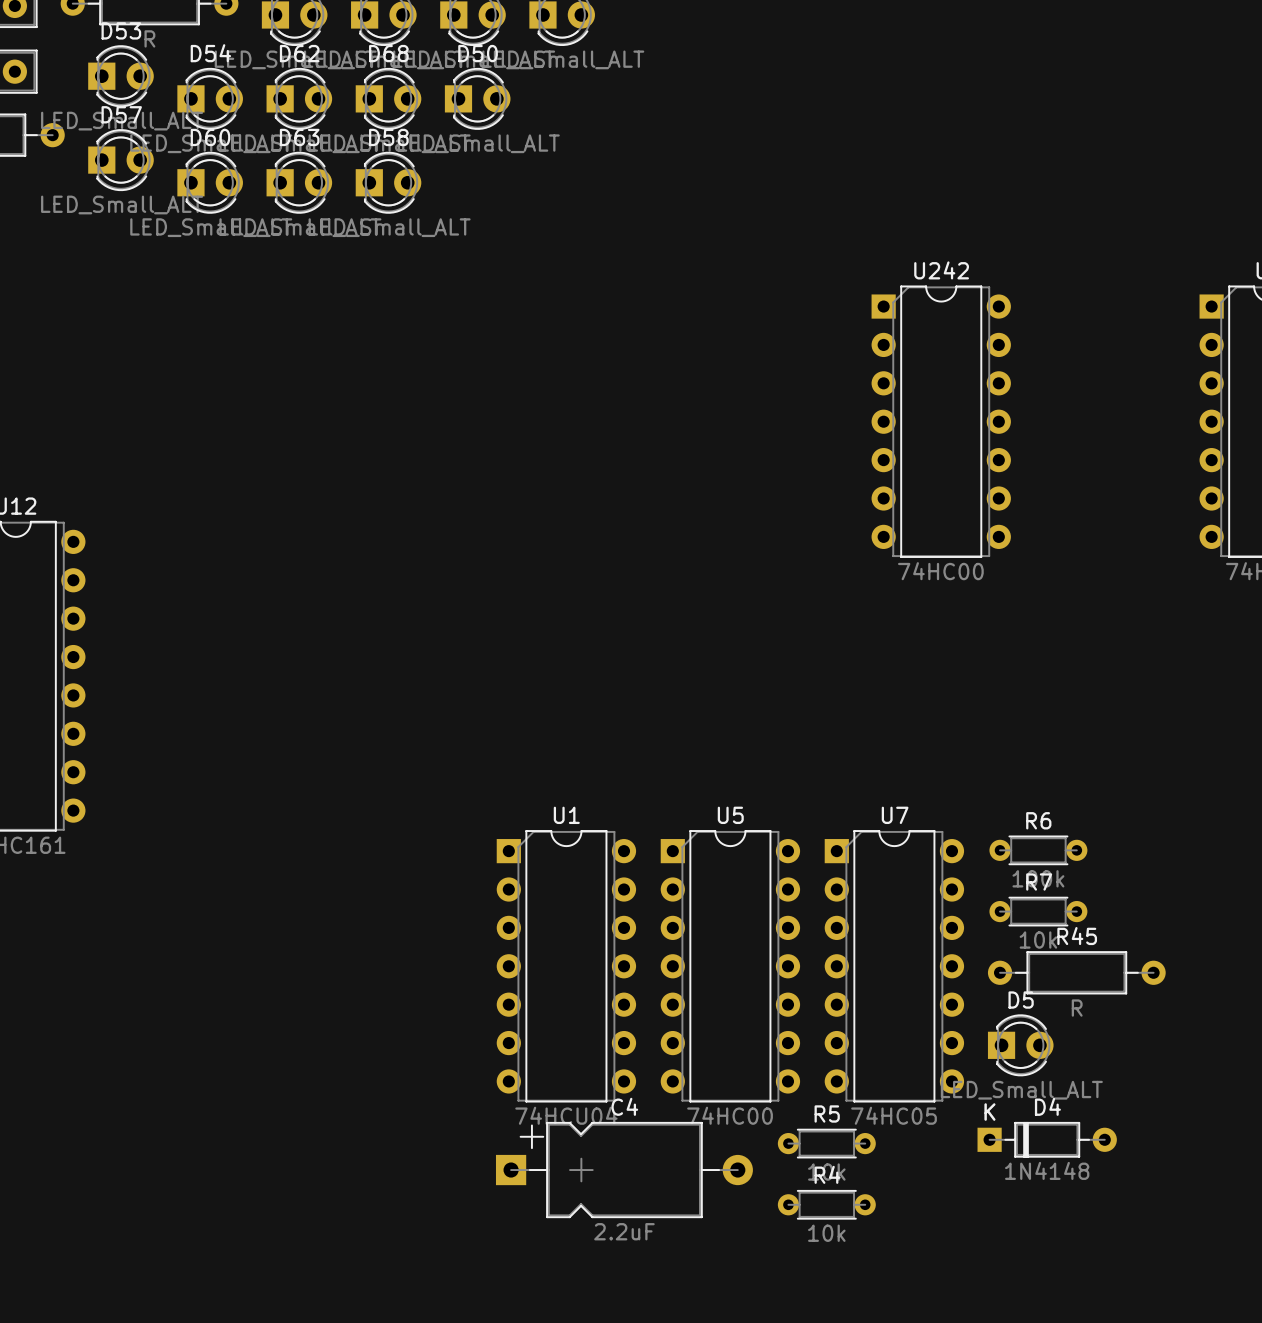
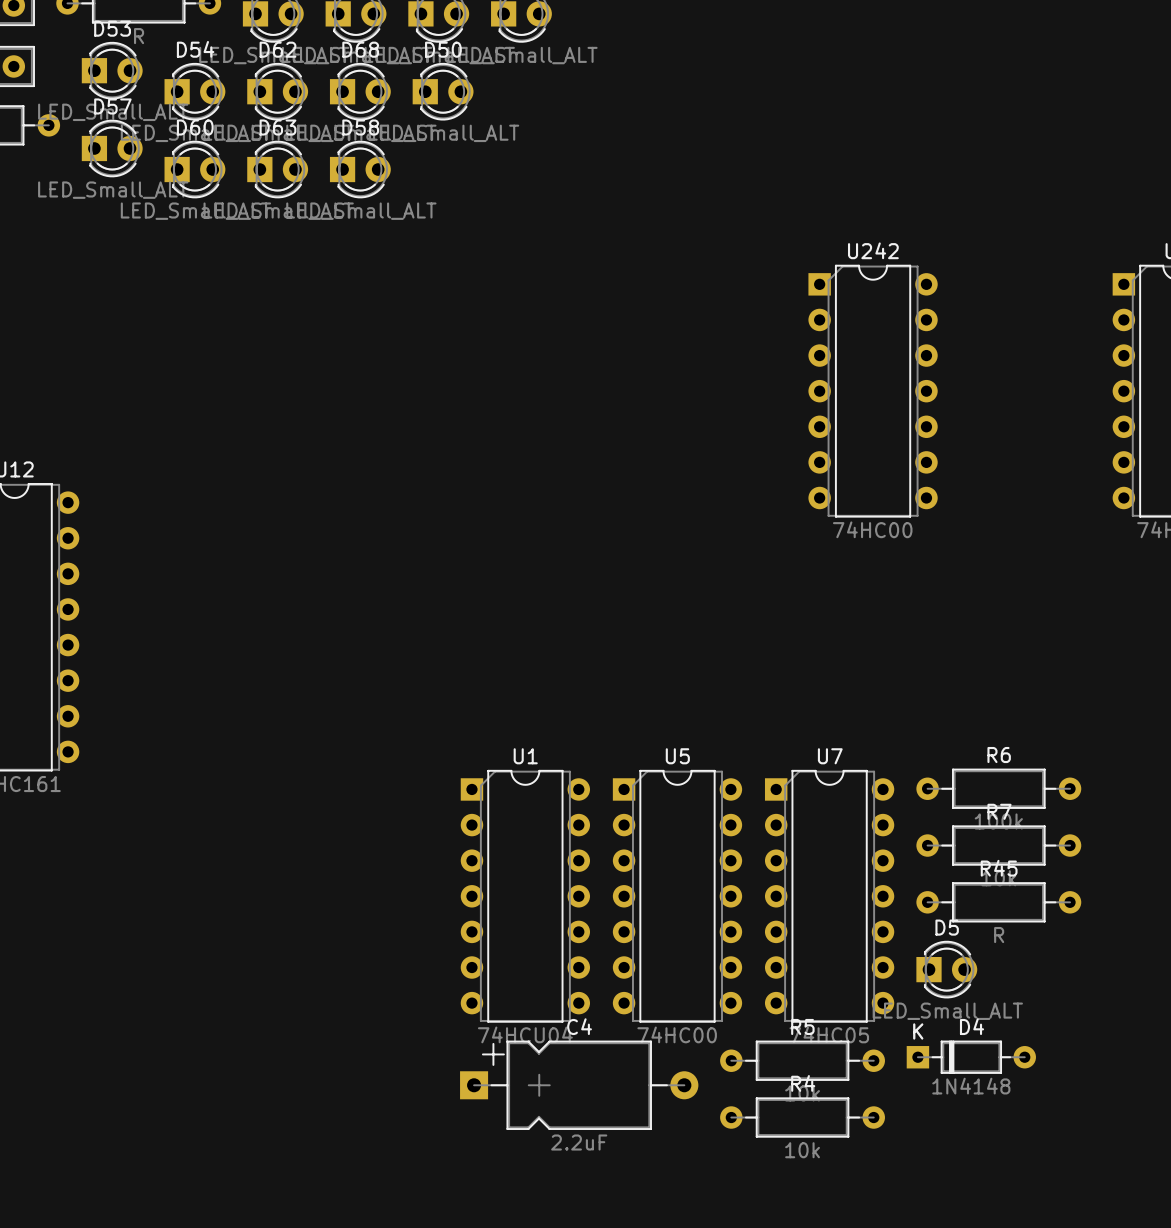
R6 footprint: [989, 835, 1088, 866] -> [916, 768, 1082, 809]
R7 footprint: [989, 896, 1088, 927] -> [916, 825, 1082, 866]
R5 footprint: [777, 1128, 876, 1159] -> [720, 1040, 885, 1081]
R4 footprint: [777, 1189, 876, 1220] -> [720, 1097, 885, 1138]

